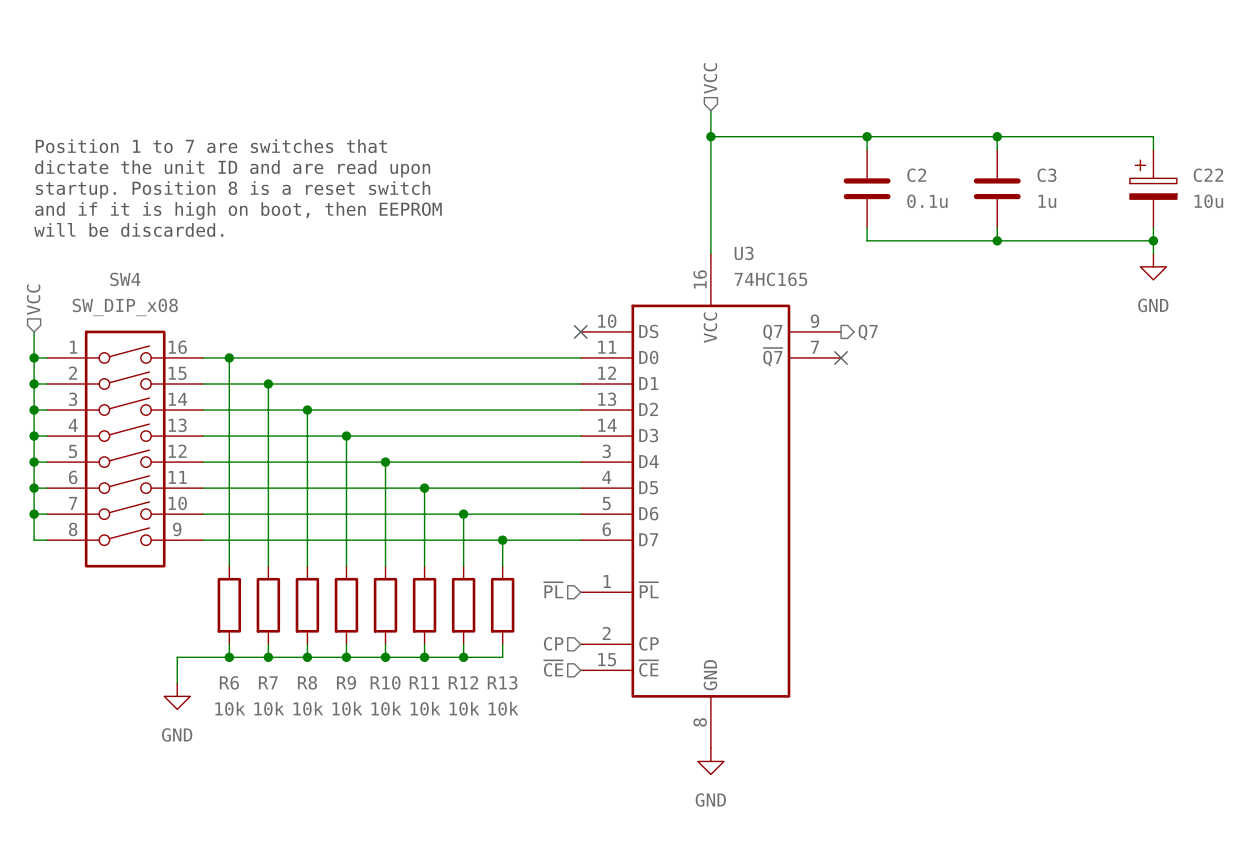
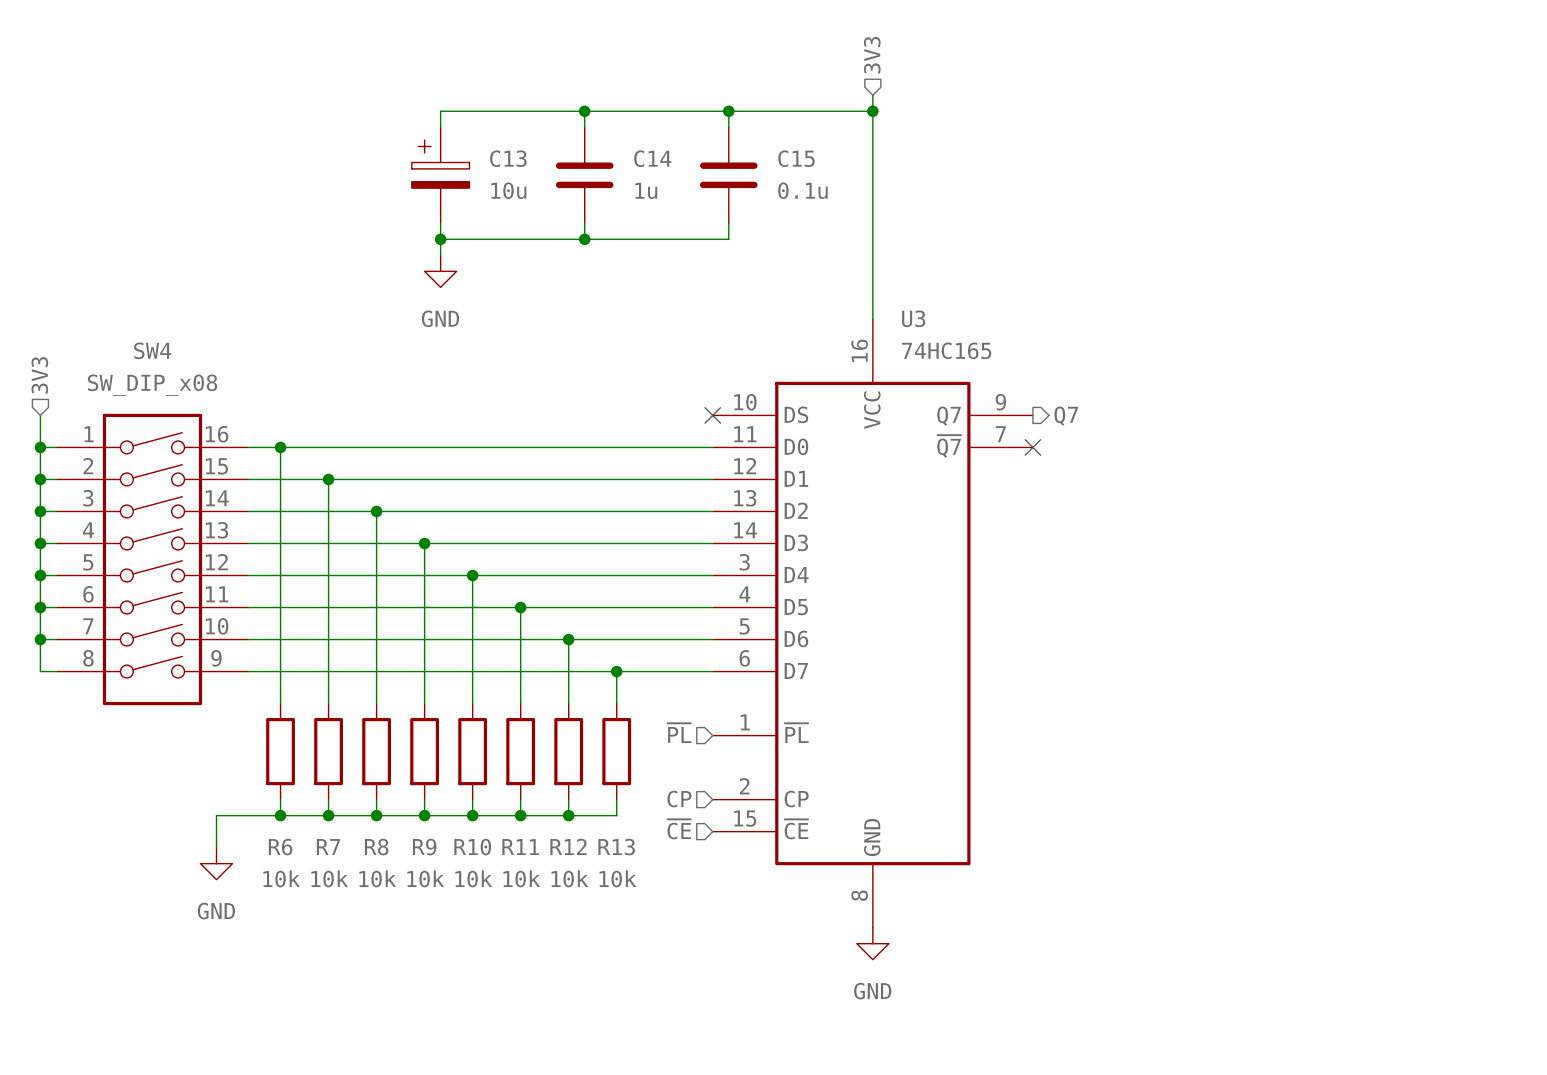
hierarchical label: none -> 3V3 (872, 55)
wire: none -> (872, 95) (872, 143)
hierarchical label: VCC (710, 78) -> none
wire: none -> (584, 111) (584, 127)
junction: none -> (584, 111)
wire: none -> (728, 111) (728, 127)
junction: none -> (728, 111)
wire: none -> (872, 111) (440, 111) (440, 127)
C13: none -> 10u (440, 175)
C14: none -> 1u (584, 175)
C15: none -> 0.1u (728, 175)
wire: (710, 136) (1153, 136) (1153, 149) -> none
junction position: (710, 136) -> (872, 111)
wire: (867, 136) (867, 149) -> none
junction: (867, 136) -> none
wire: (997, 136) (997, 149) -> none
junction: (997, 136) -> none
text: Position 1 to 7 are switches that (211, 146) -> none
text: dictate the unit ID and are read upon (232, 168) -> none
wire: none -> (440, 223) (440, 255)
wire: none -> (584, 223) (584, 239)
wire: none -> (728, 223) (728, 239) (440, 239)
junction: none -> (440, 239)
junction: none -> (584, 239)
C2: 0.1u (867, 188) -> none
C3: 1u (997, 188) -> none
C22: 10u (1153, 188) -> none
text: startup. Position 8 is a reset switch (233, 189) -> none
text: and if it is high on boot, then EEPROM (238, 210) -> none
power symbol: none -> GND (440, 271)
wire: (867, 227) (867, 240) (1153, 240) -> none
wire: (997, 227) (997, 240) -> none
wire: (1153, 227) (1153, 253) -> none
text: will be discarded. (128, 229) -> none
junction: (997, 240) -> none
junction: (1153, 240) -> none
power symbol: GND (1153, 266) -> none
hierarchical label: VCC (33, 299) -> 3V3 (39, 375)

